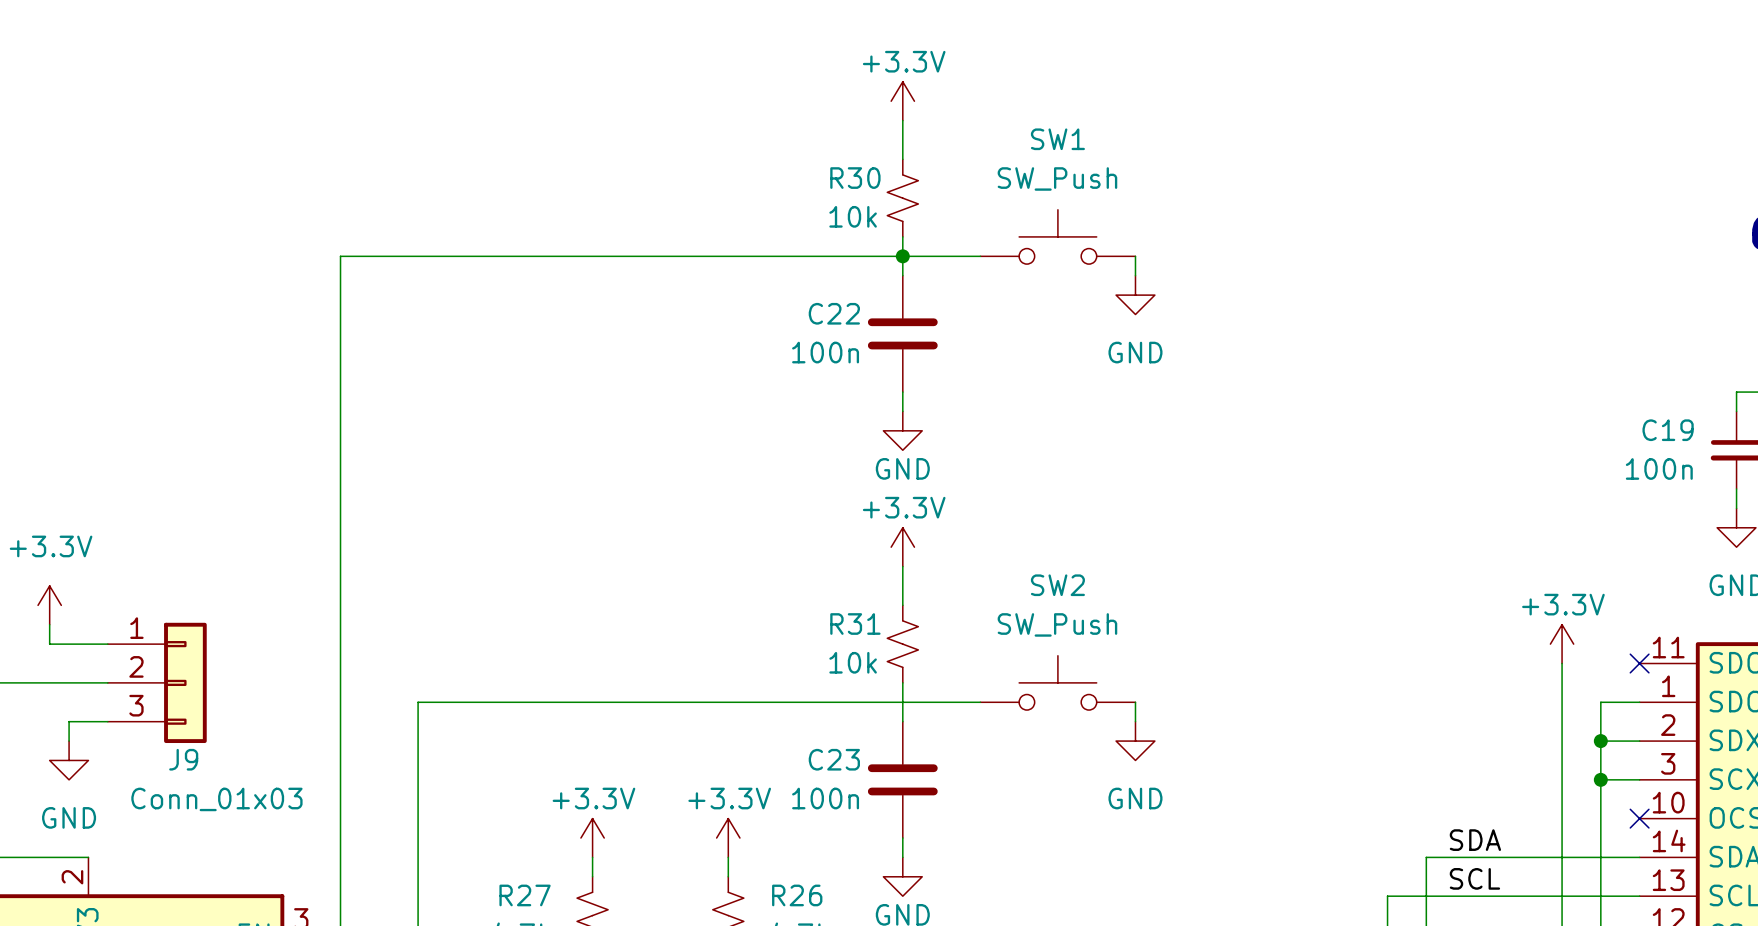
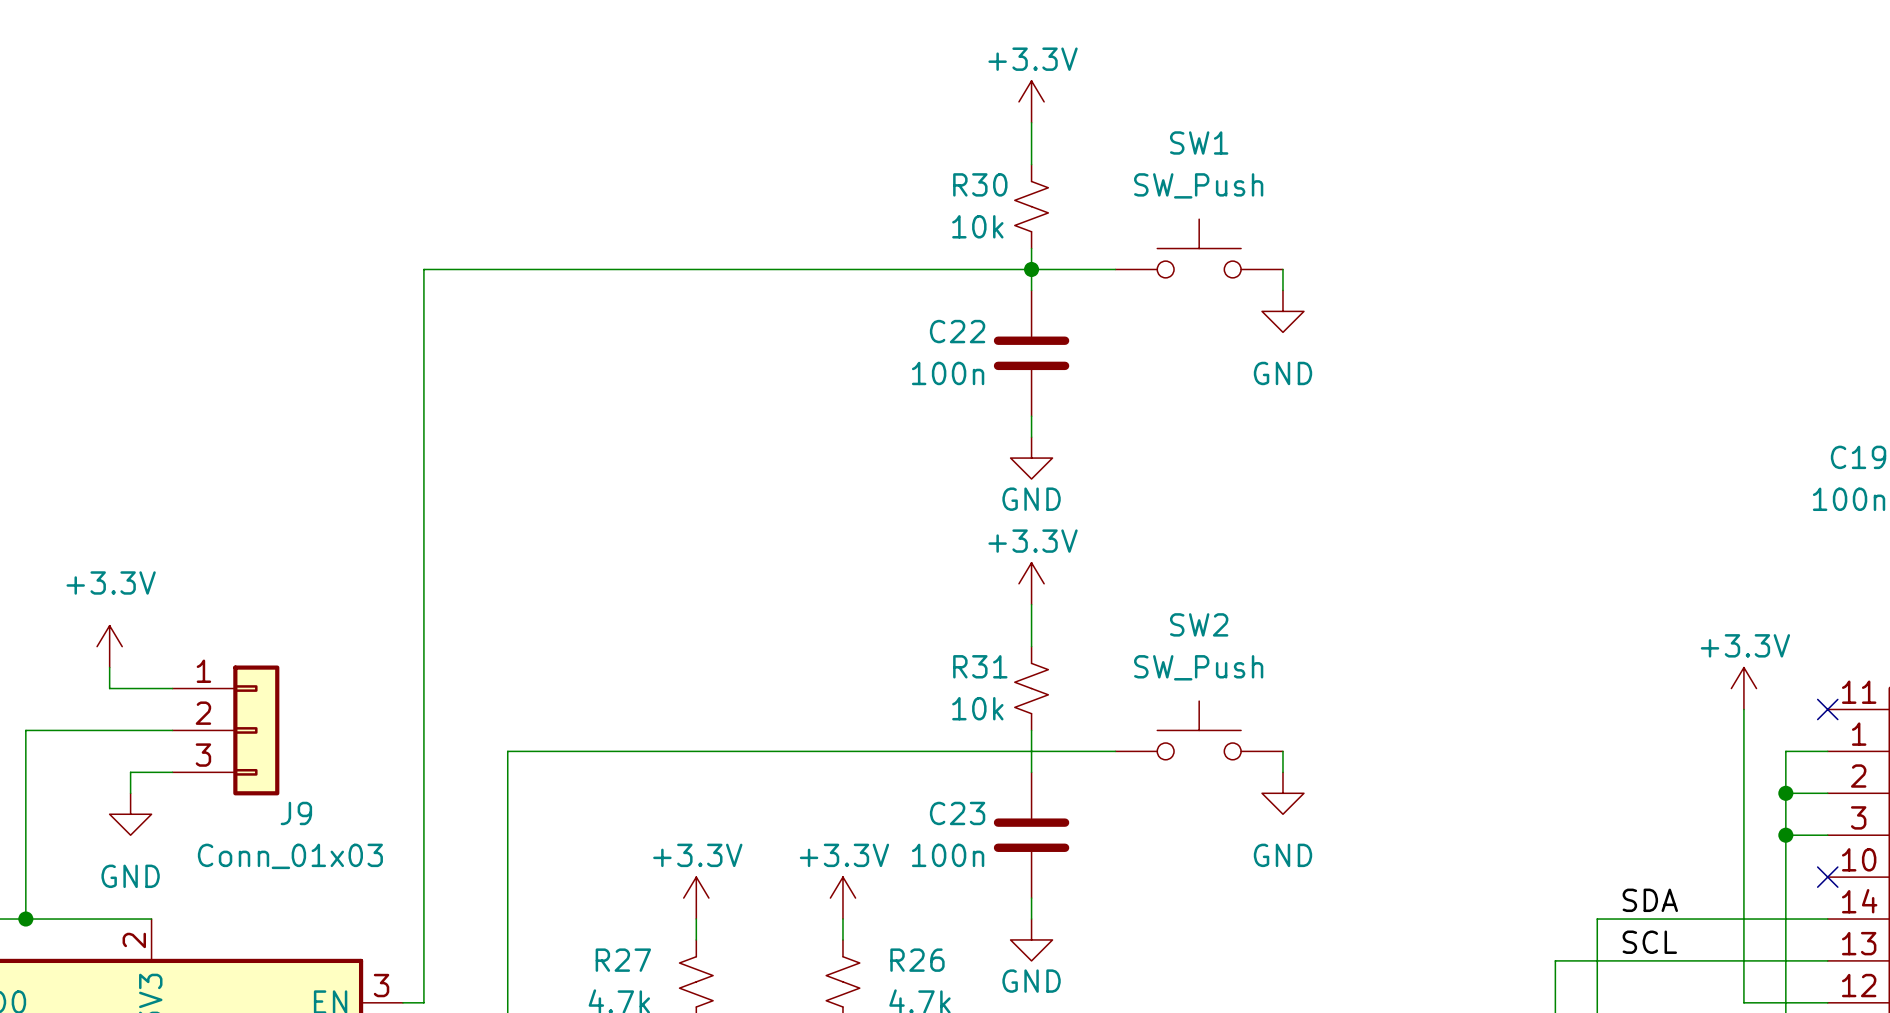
J9 name position: J9 (183, 759) -> J9 (296, 813)

